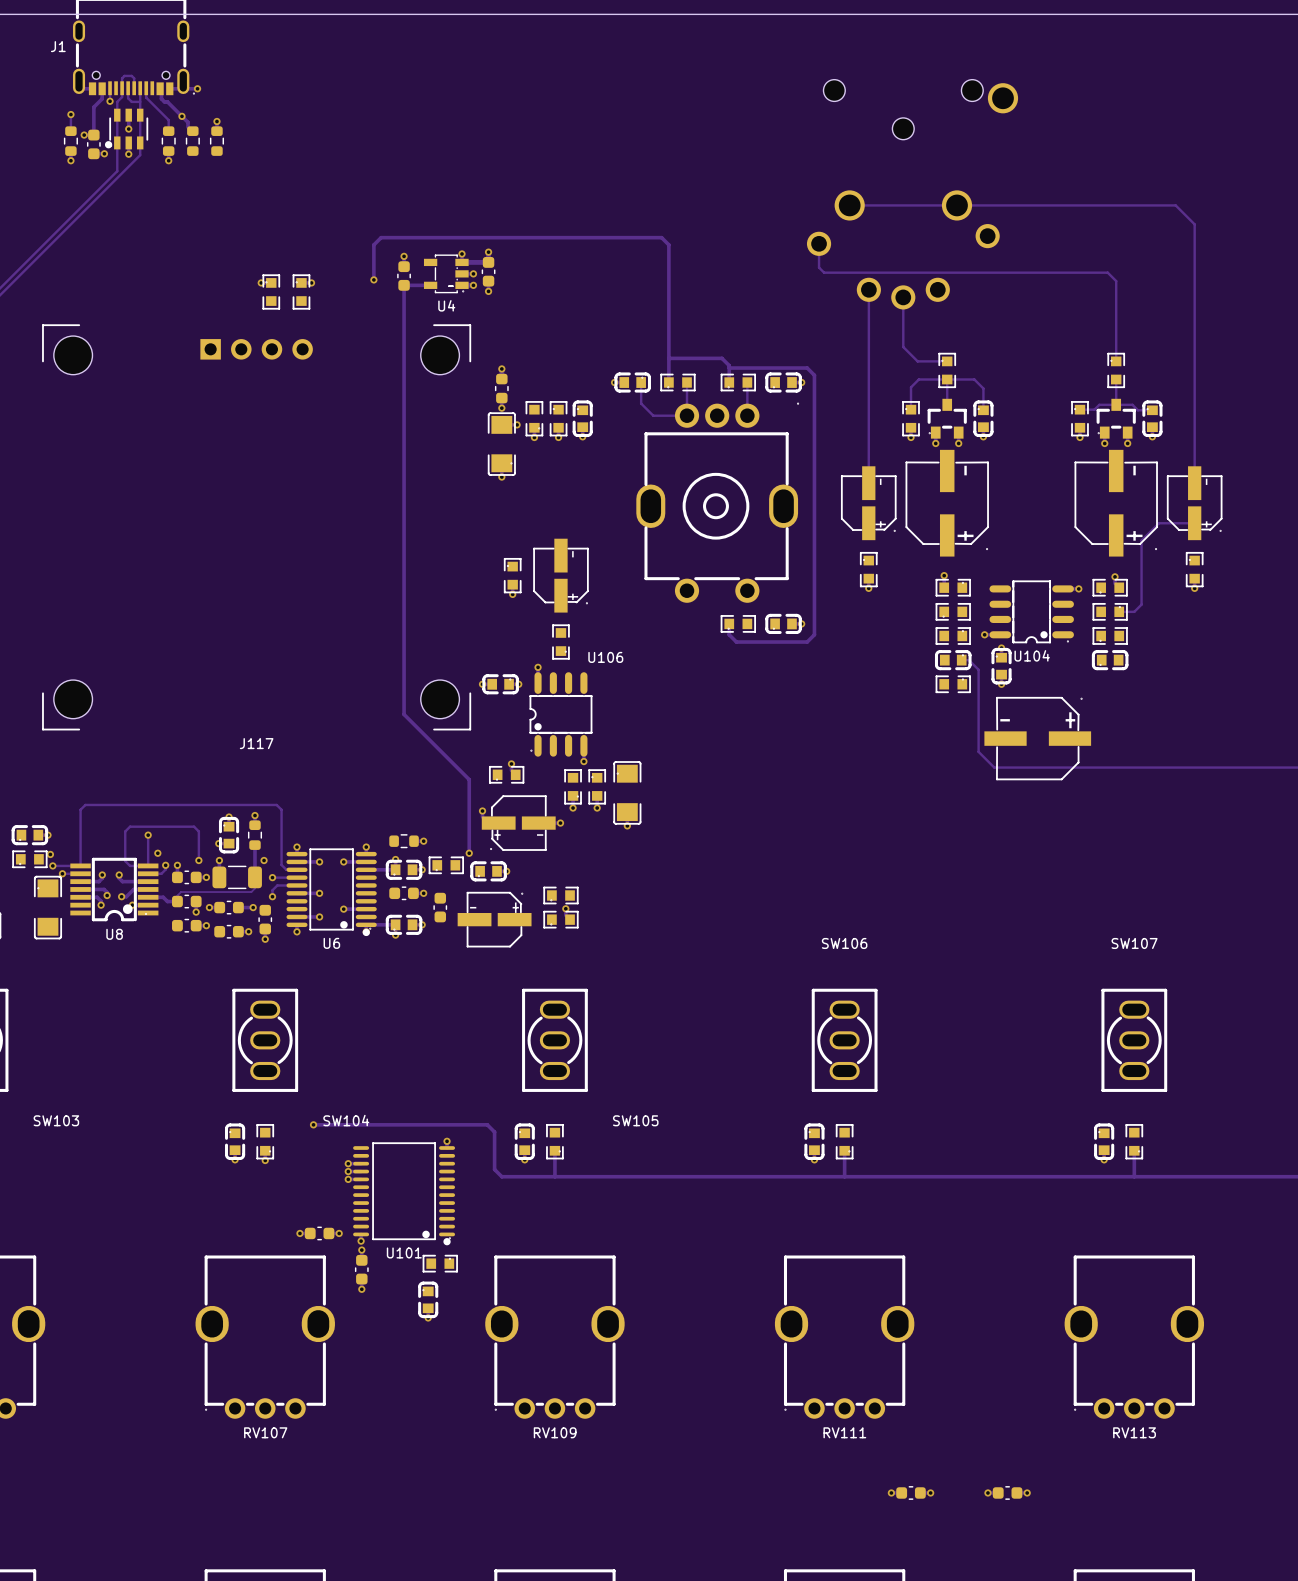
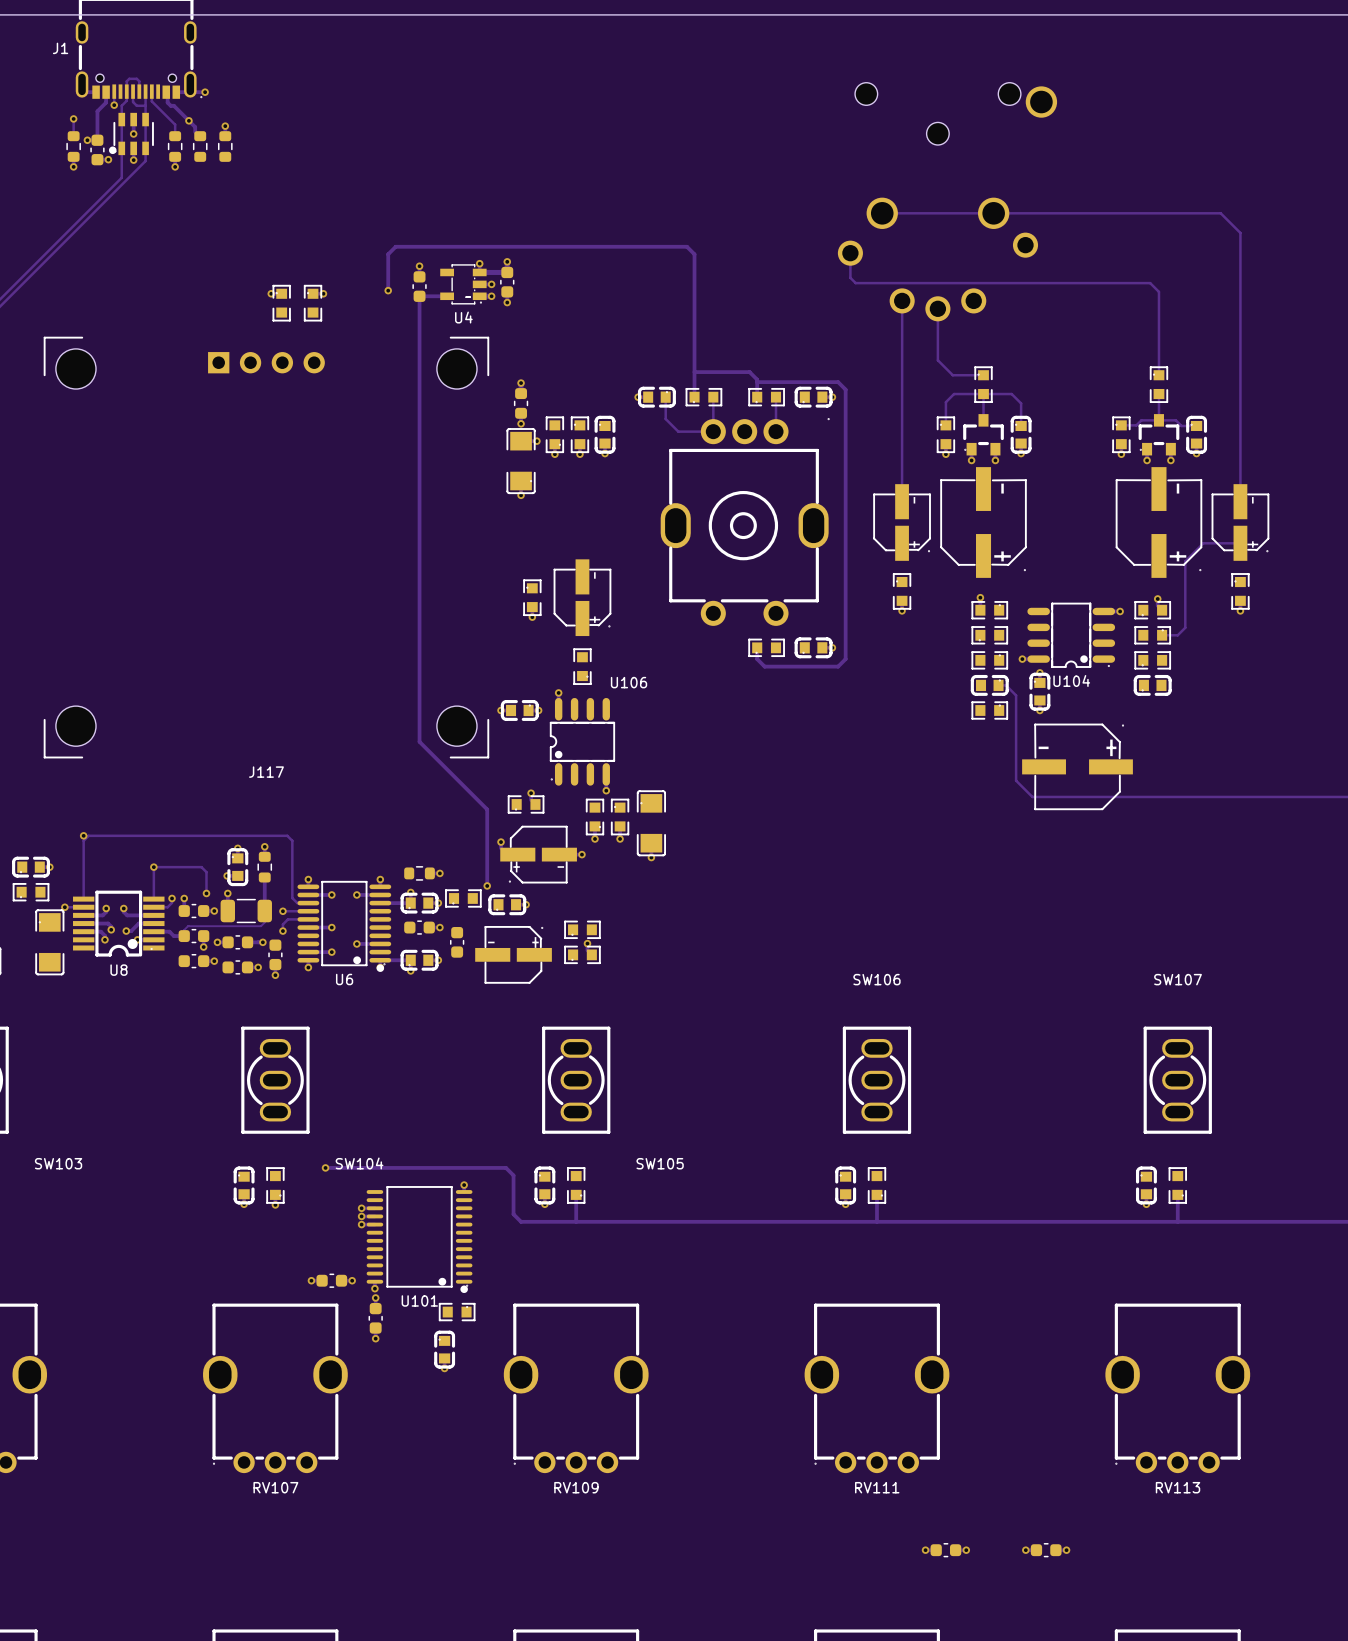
via: none -> (83, 835)
track: (198, 839) (198, 831) (194, 826) (130, 826) (125, 831) (125, 861) (130, 865) (148, 865) -> (206, 872) (201, 867) (153, 867)
via: (157, 853) -> none
via: (50, 854) -> none
via: (264, 860) -> none
track: (52, 865) (80, 865) -> none
via: (52, 865) -> none

